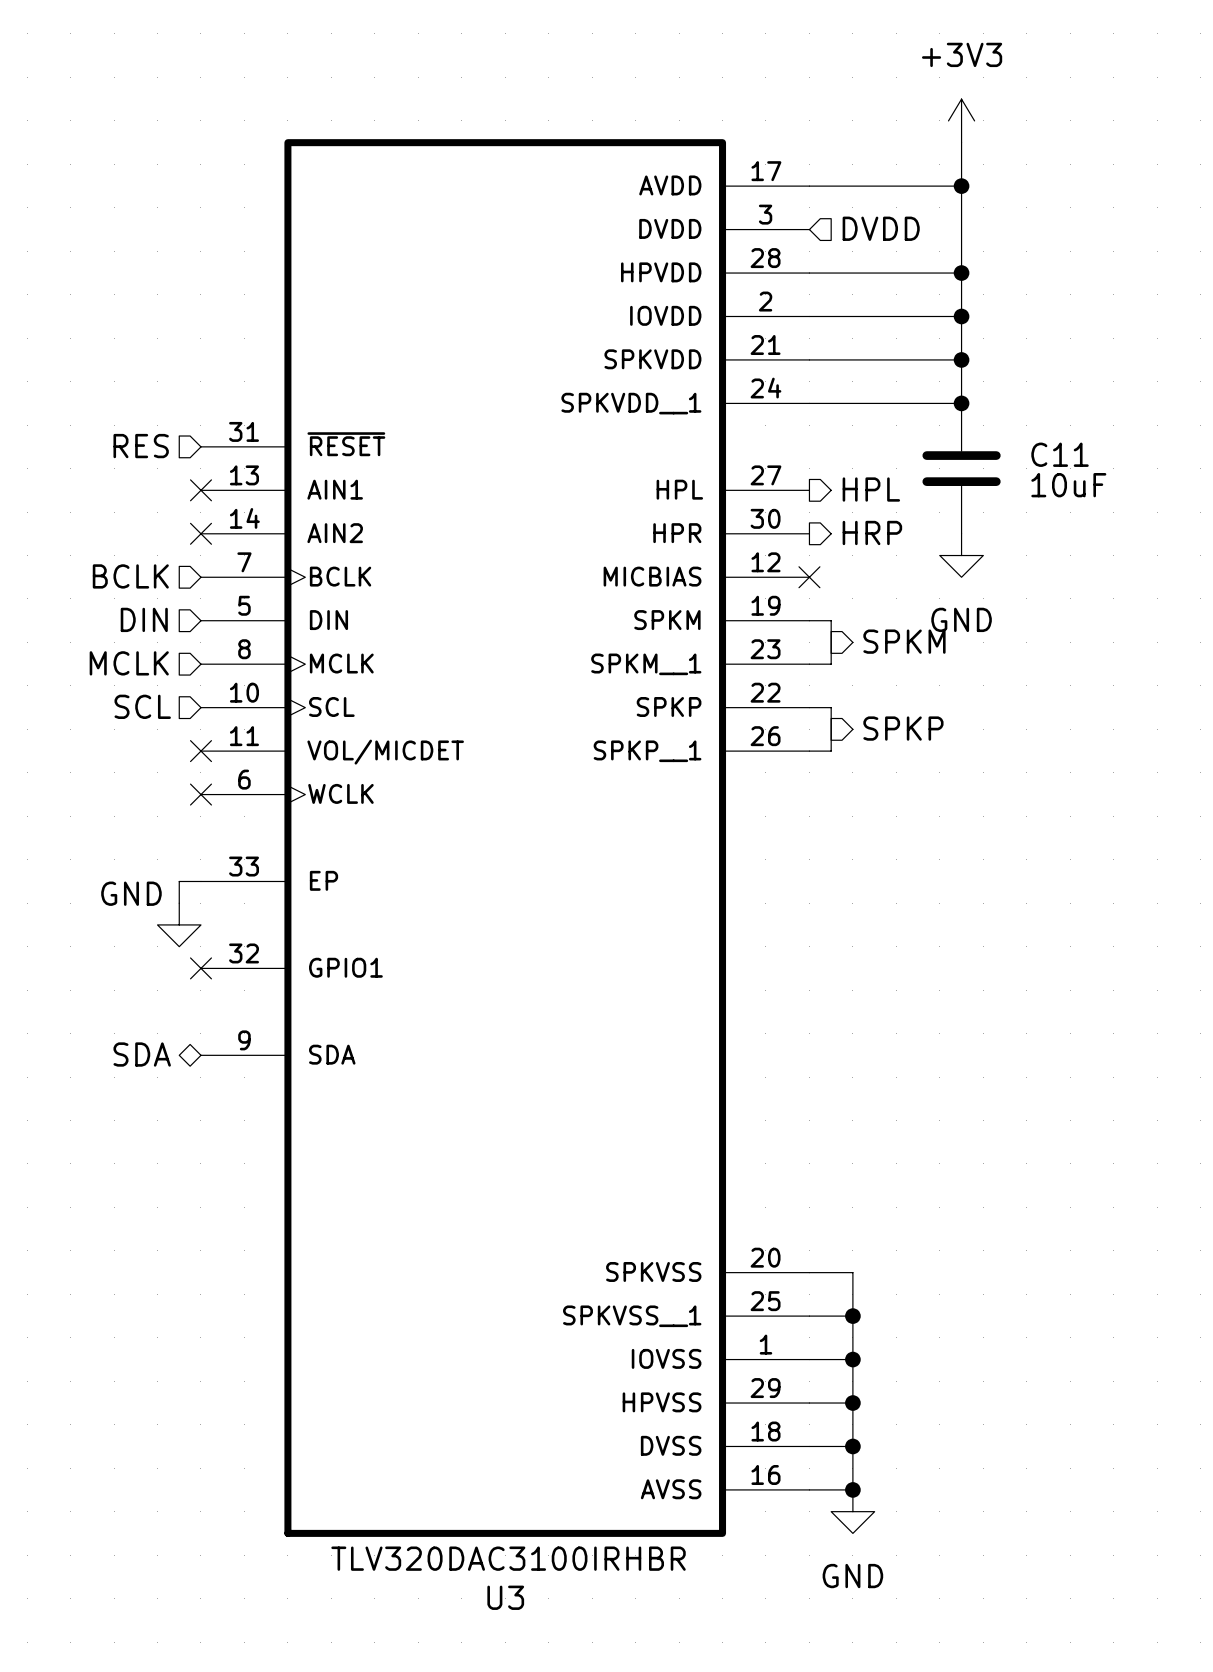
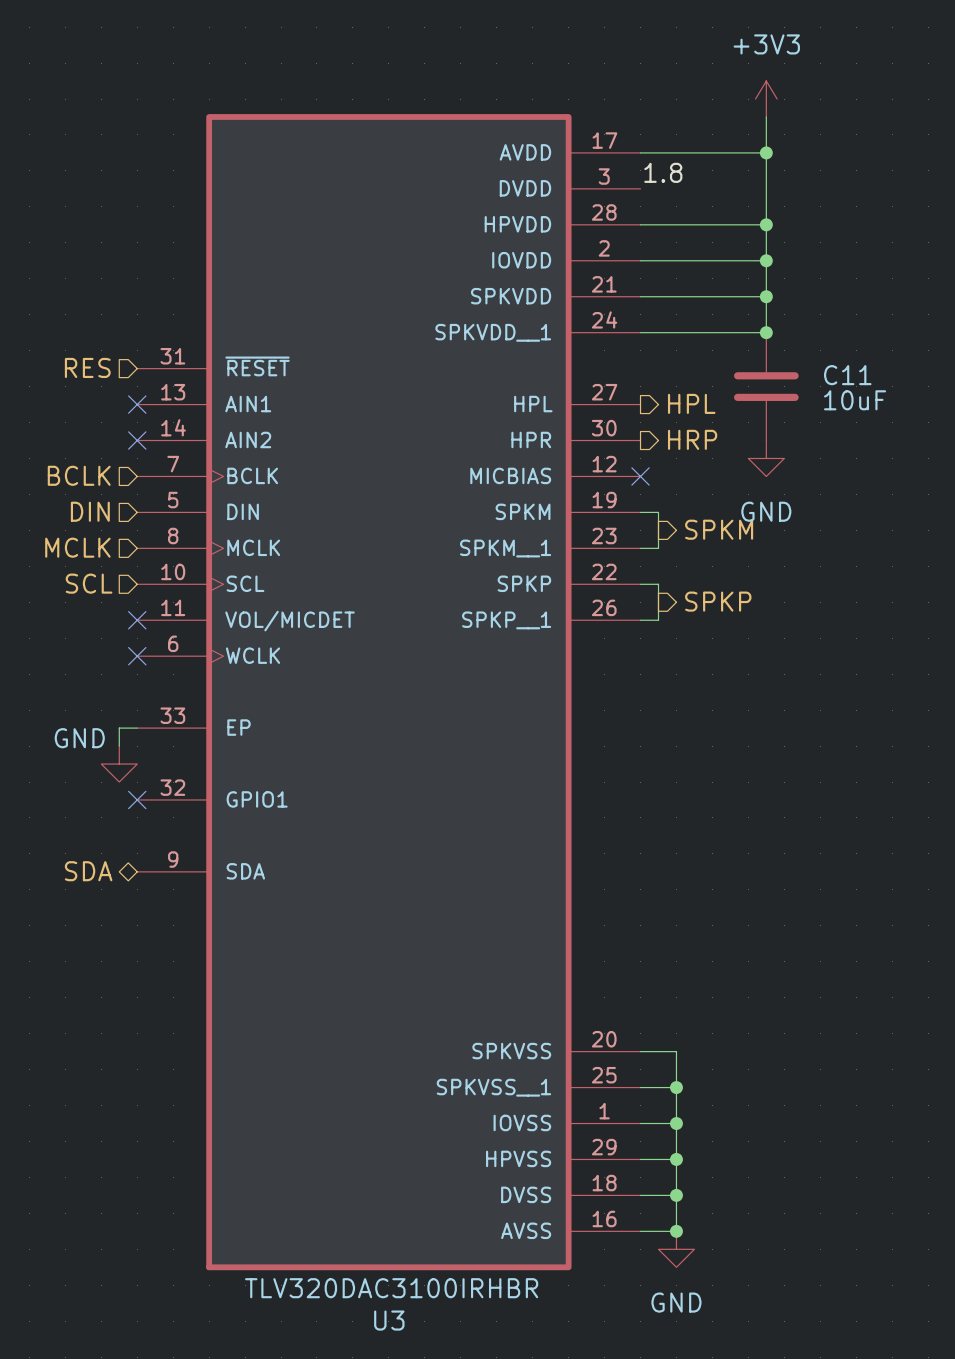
label: none -> 1.8 (663, 172)
hierarchical label: DVDD (881, 228) -> none

